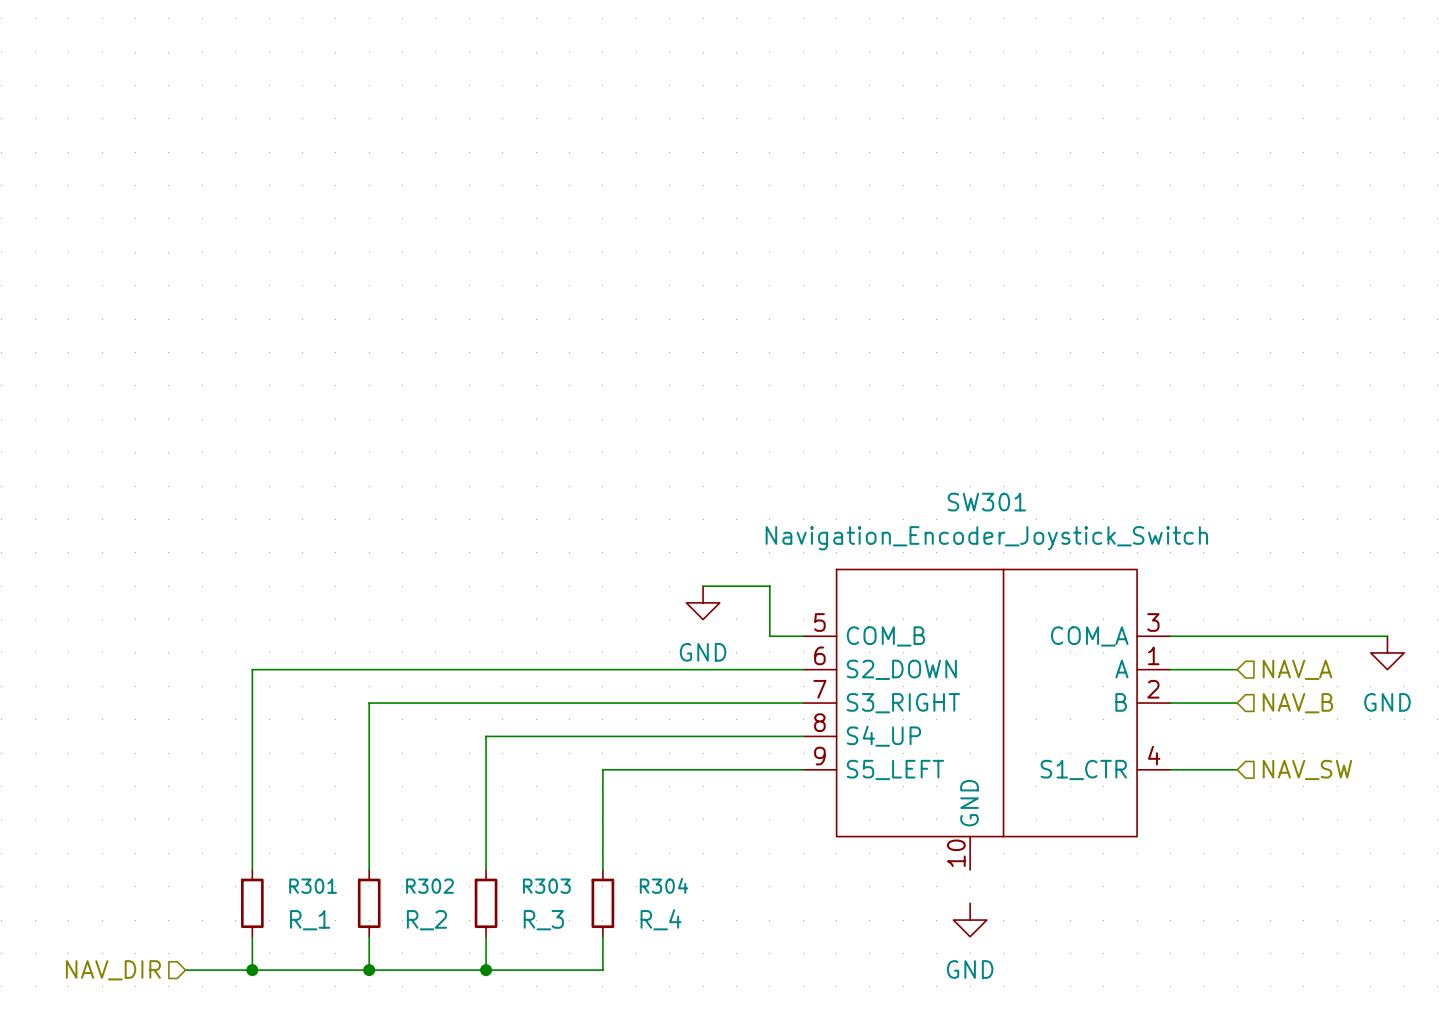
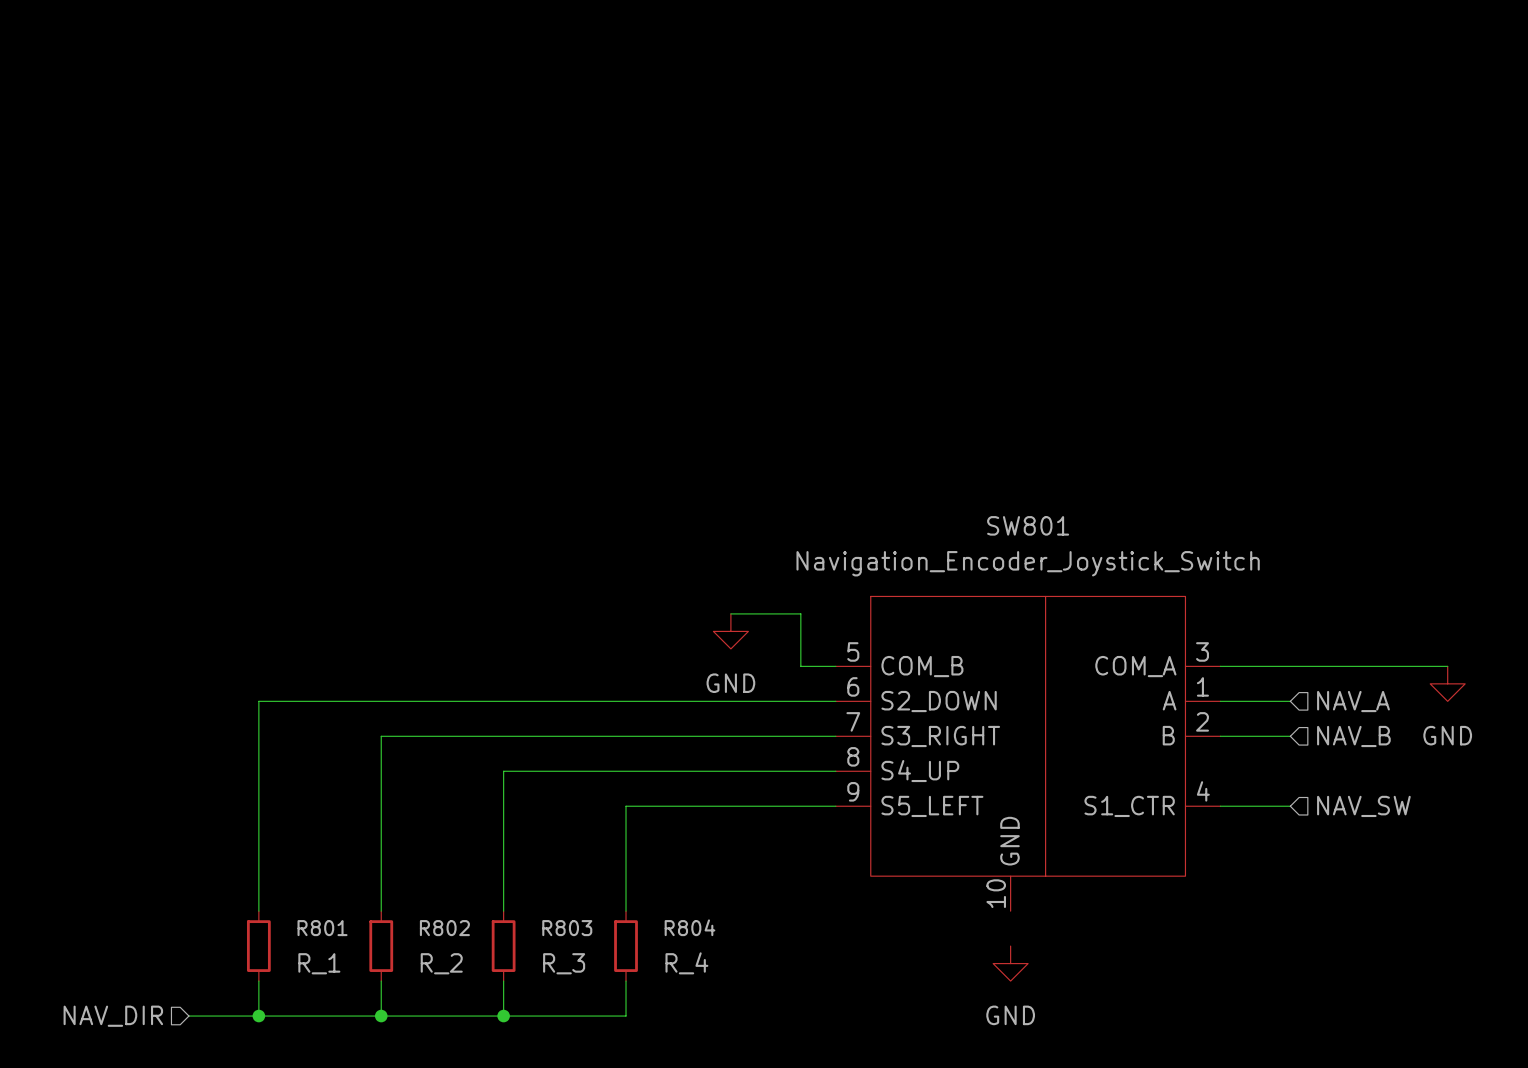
SW301 name: SW301 (986, 502) -> SW801 (1028, 525)
R304 name: R304 (663, 885) -> R804 (689, 927)
R301 name: R301 (313, 886) -> R801 (322, 928)
R302 name: R302 (429, 886) -> R802 (444, 928)
R303 name: R303 (546, 886) -> R803 (567, 928)

